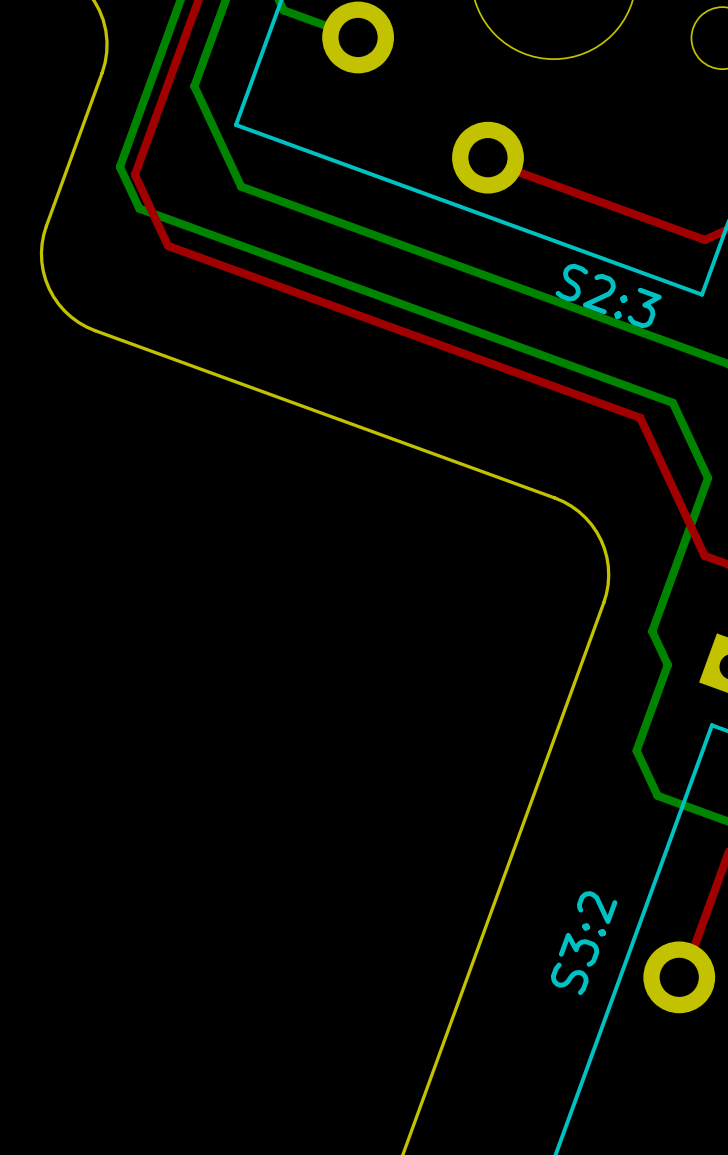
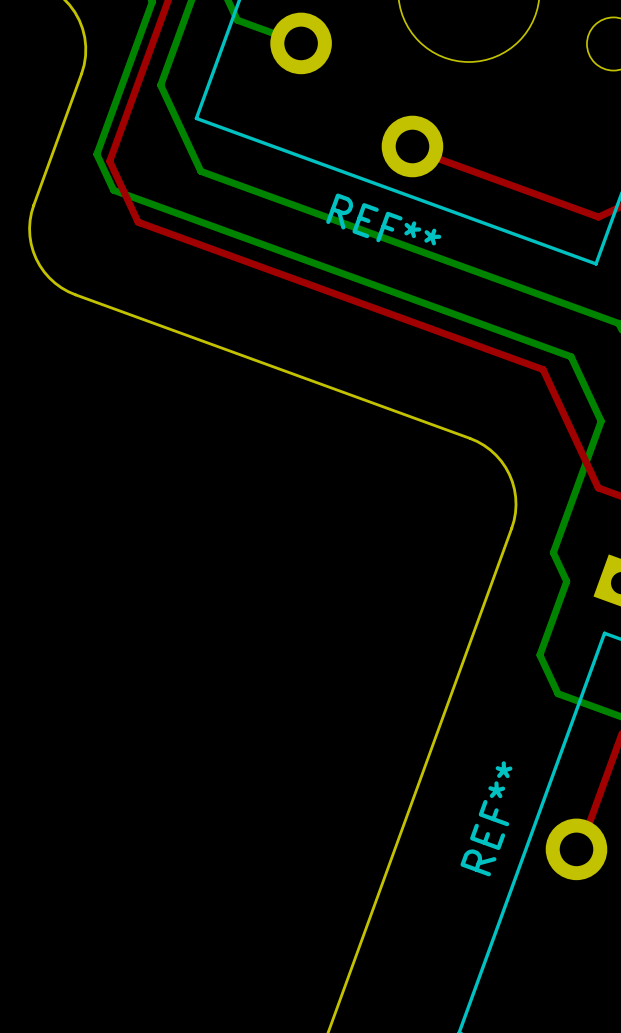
REF** name: S2:3 (608, 295) -> REF** (383, 219)
REF** name: S3:2 (584, 943) -> REF** (486, 818)

